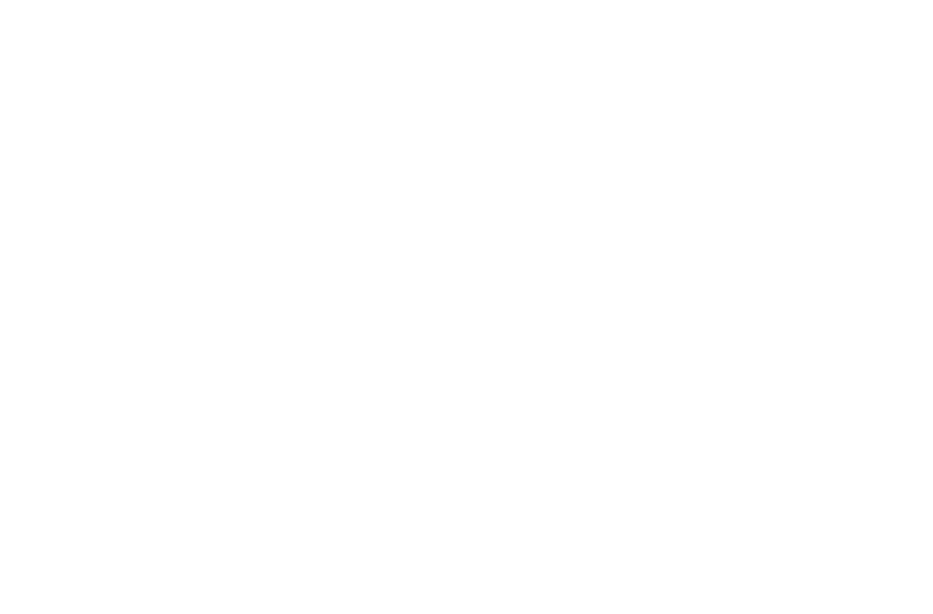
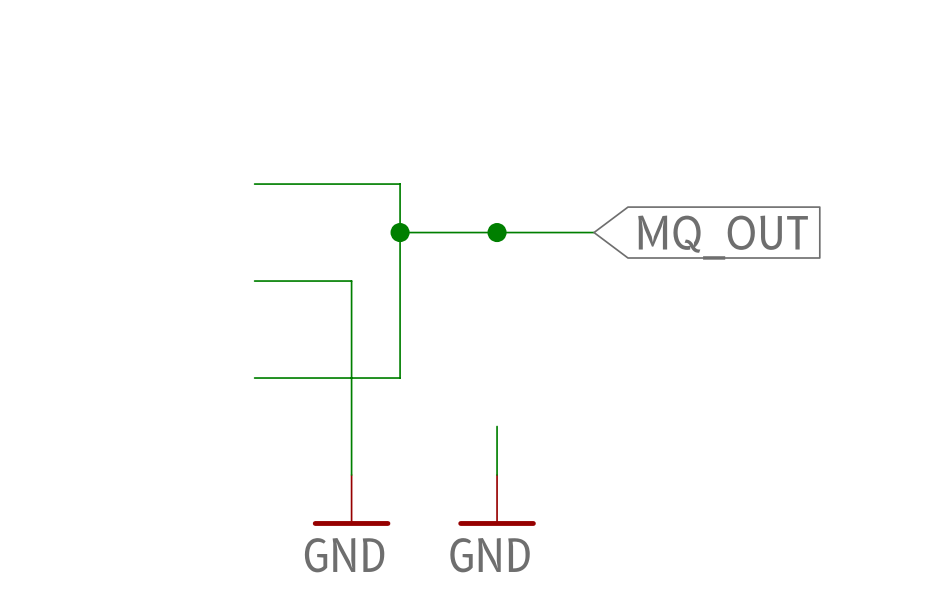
wire: none -> (254, 184) (400, 184) (400, 378) (254, 378)
wire: none -> (400, 232) (594, 232)
junction: none -> (400, 232)
junction: none -> (497, 232)
global label: none -> MQ_OUT (723, 237)
wire: none -> (254, 281) (351, 281) (351, 474)
wire: none -> (497, 426) (497, 474)
power symbol: none -> GND (351, 500)
power symbol: none -> GND (497, 500)

